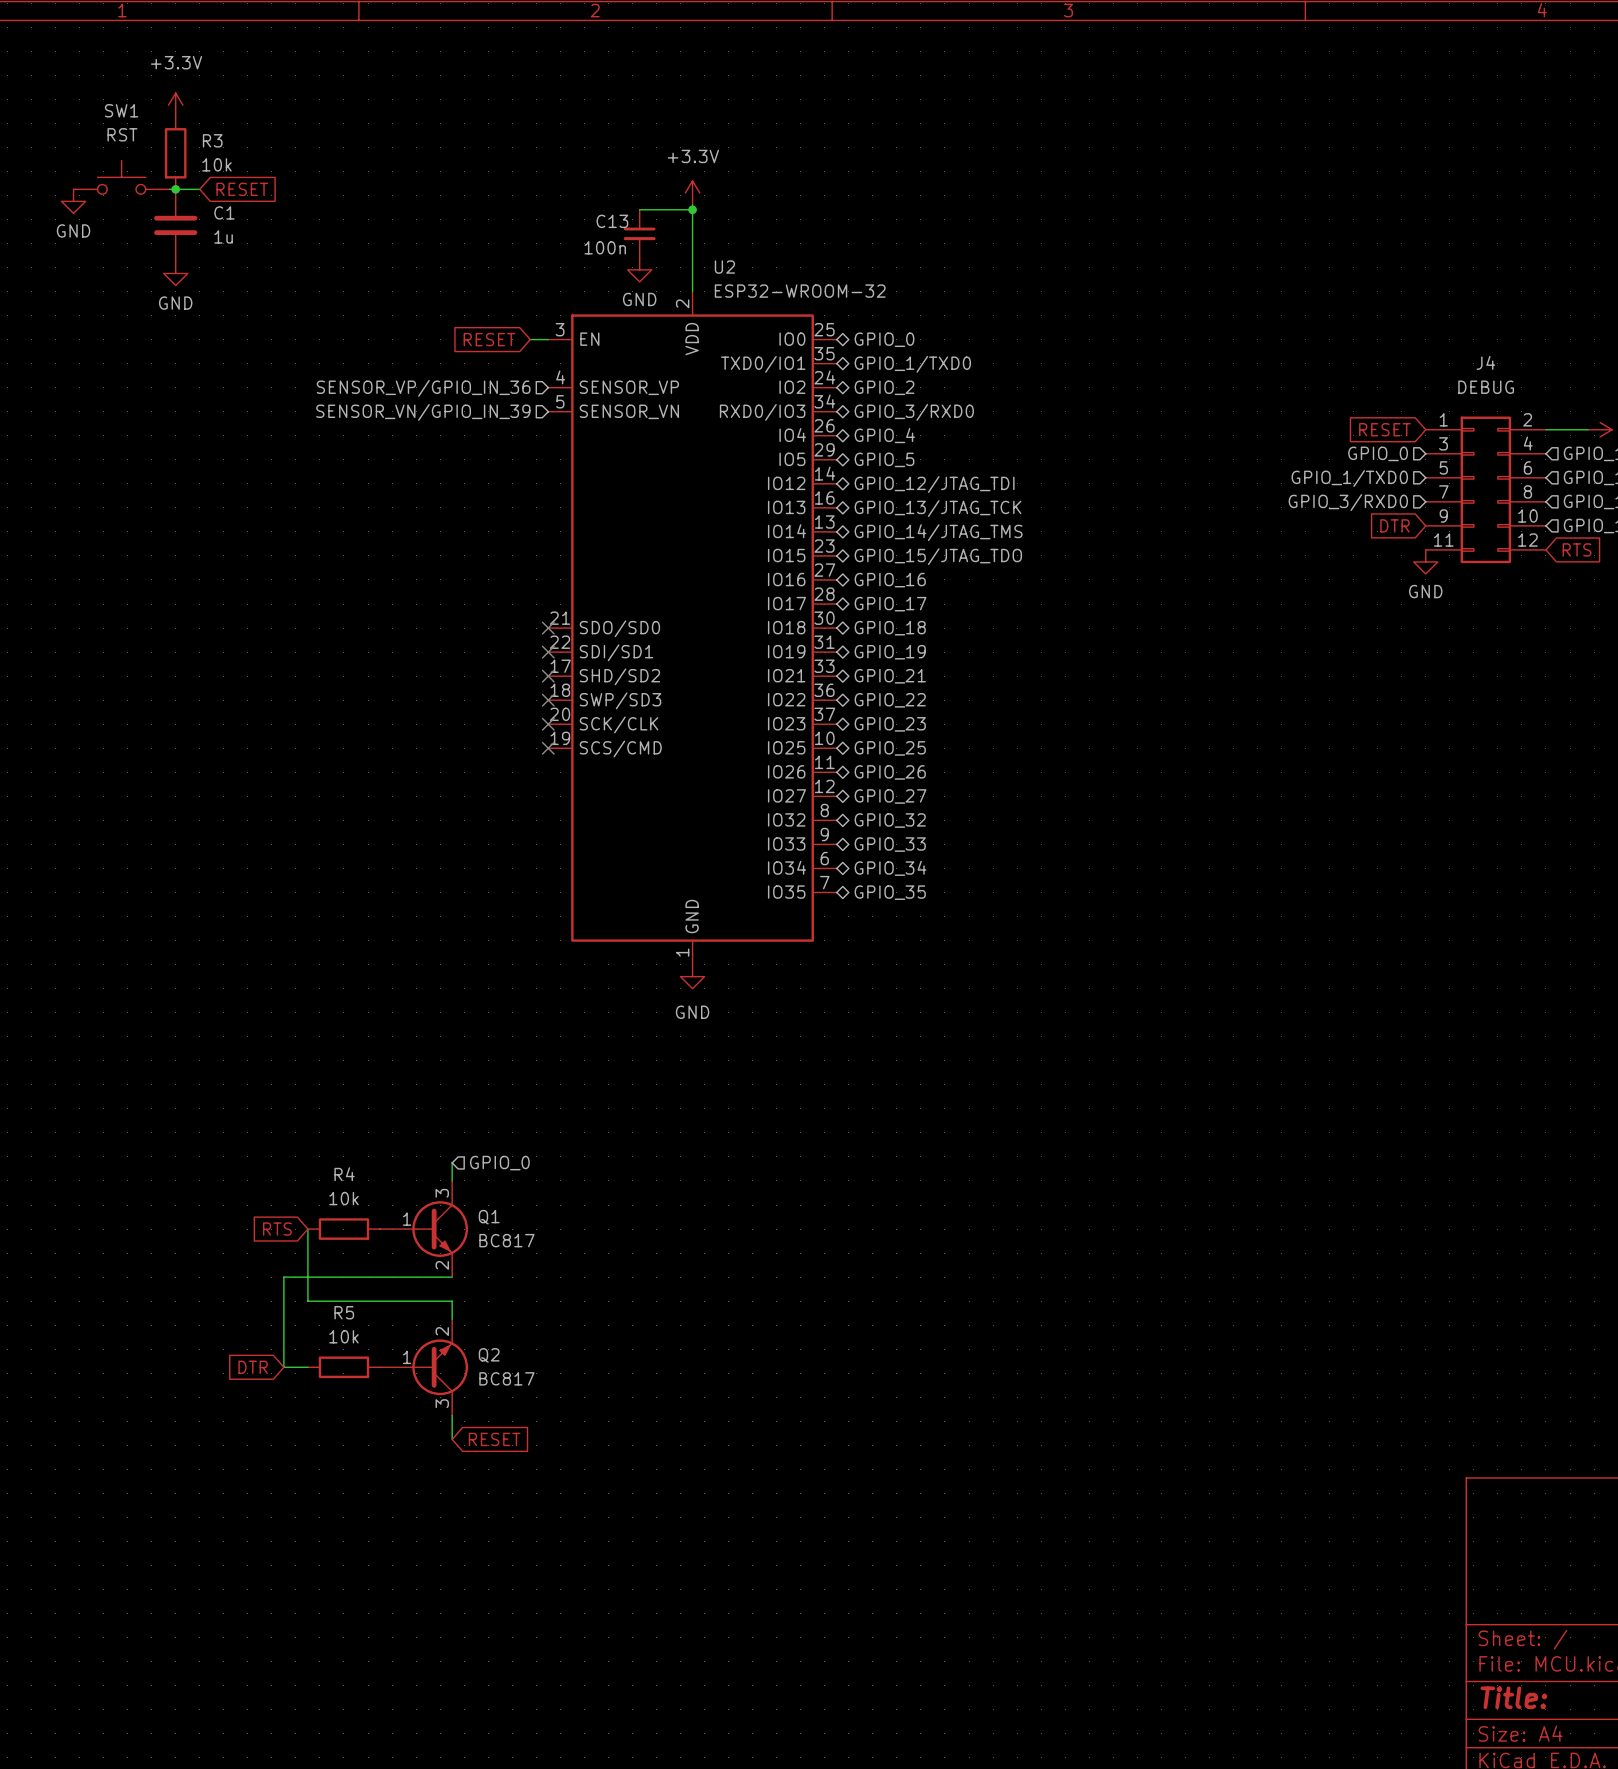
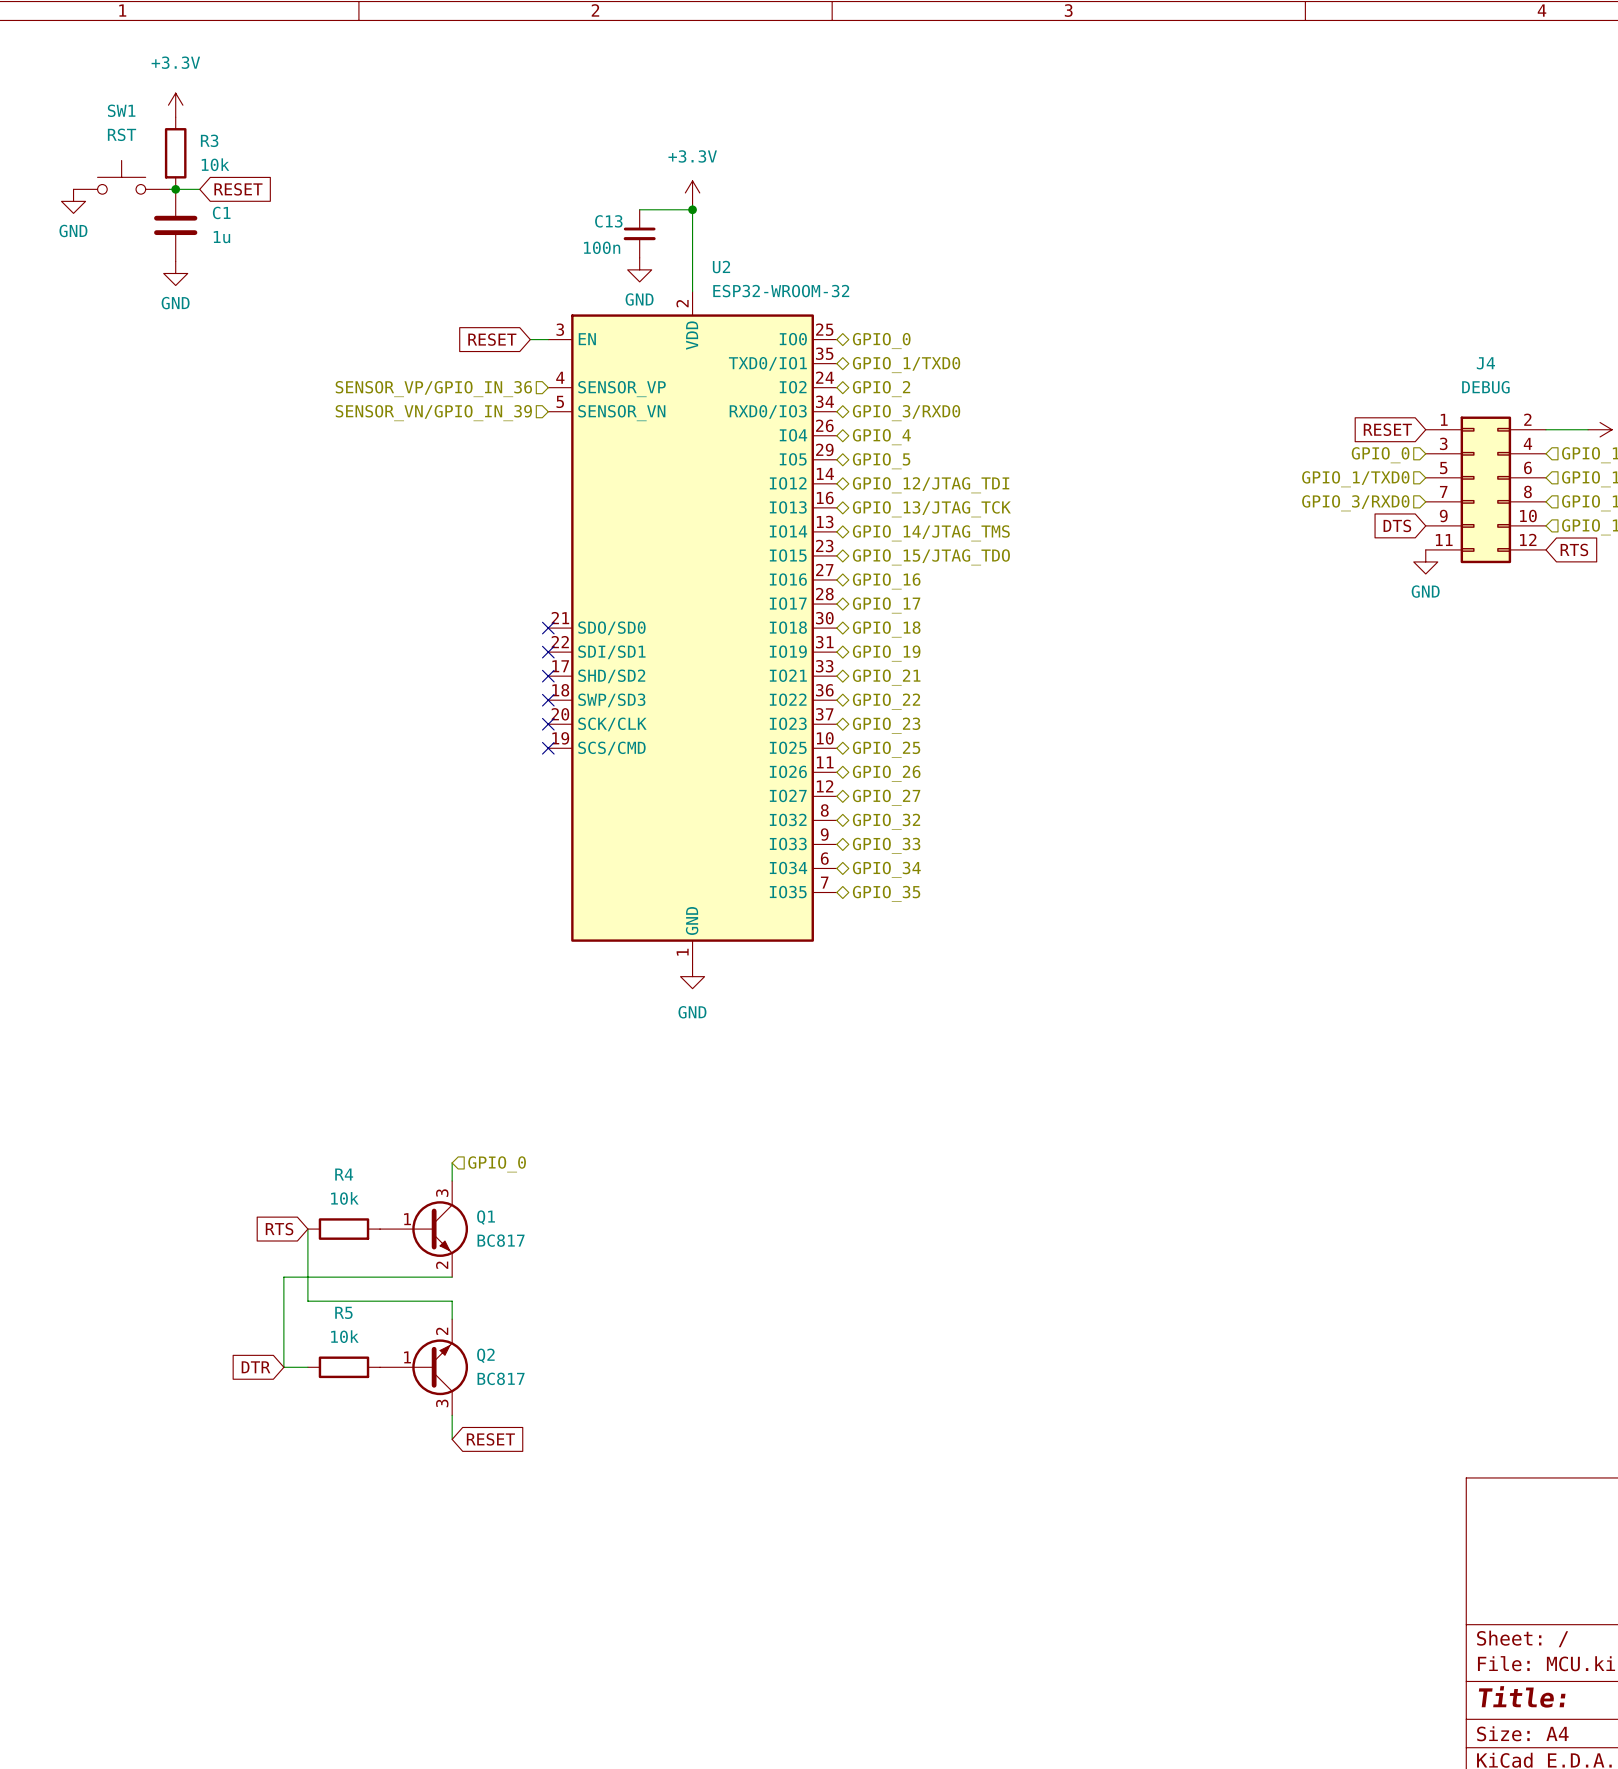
global label: DTR (1394, 525) -> DTS (1397, 525)

